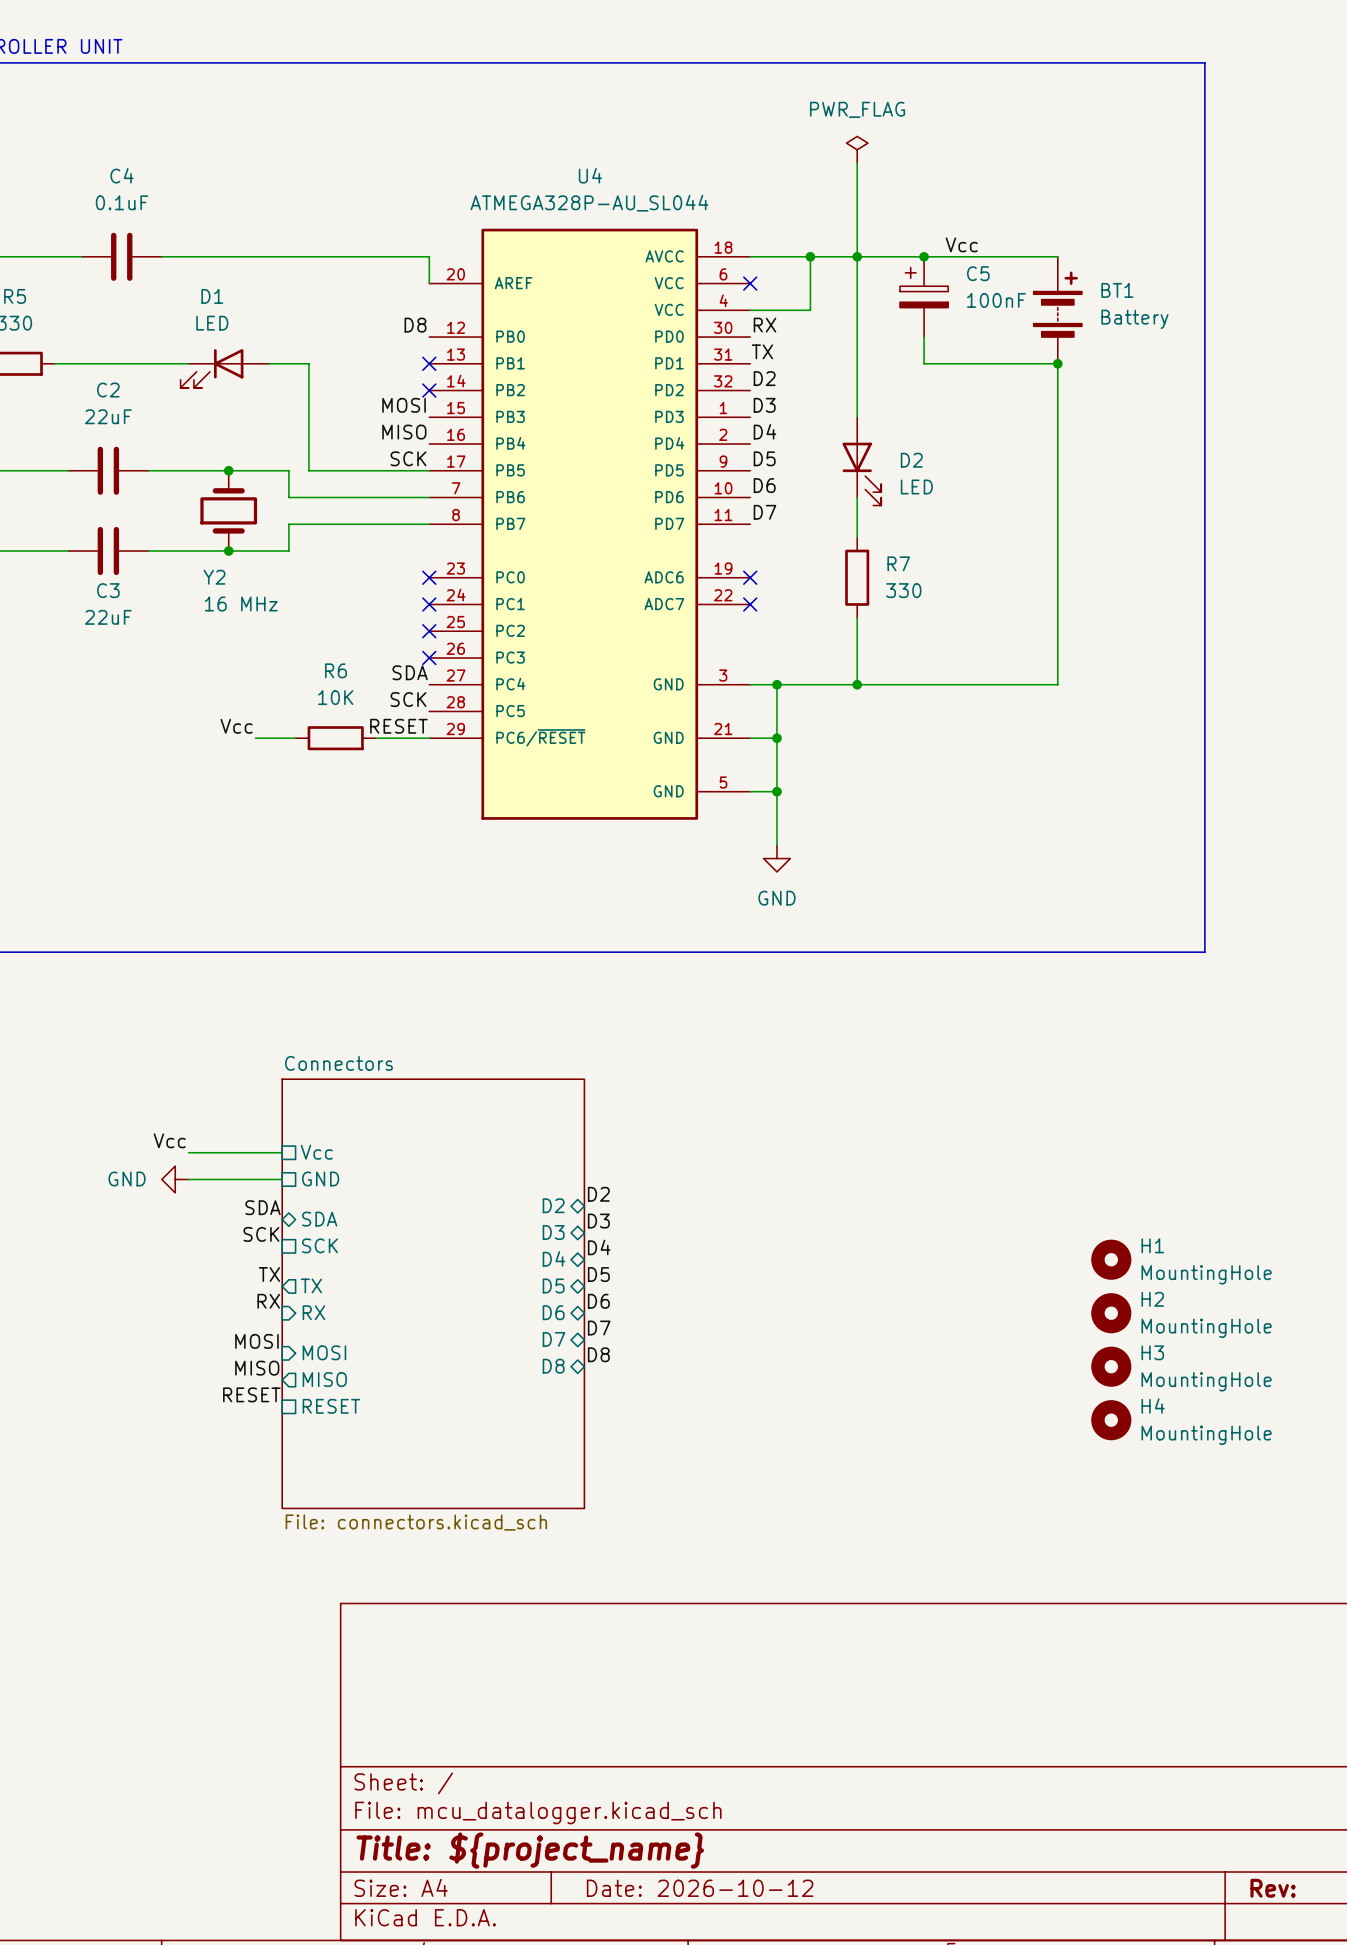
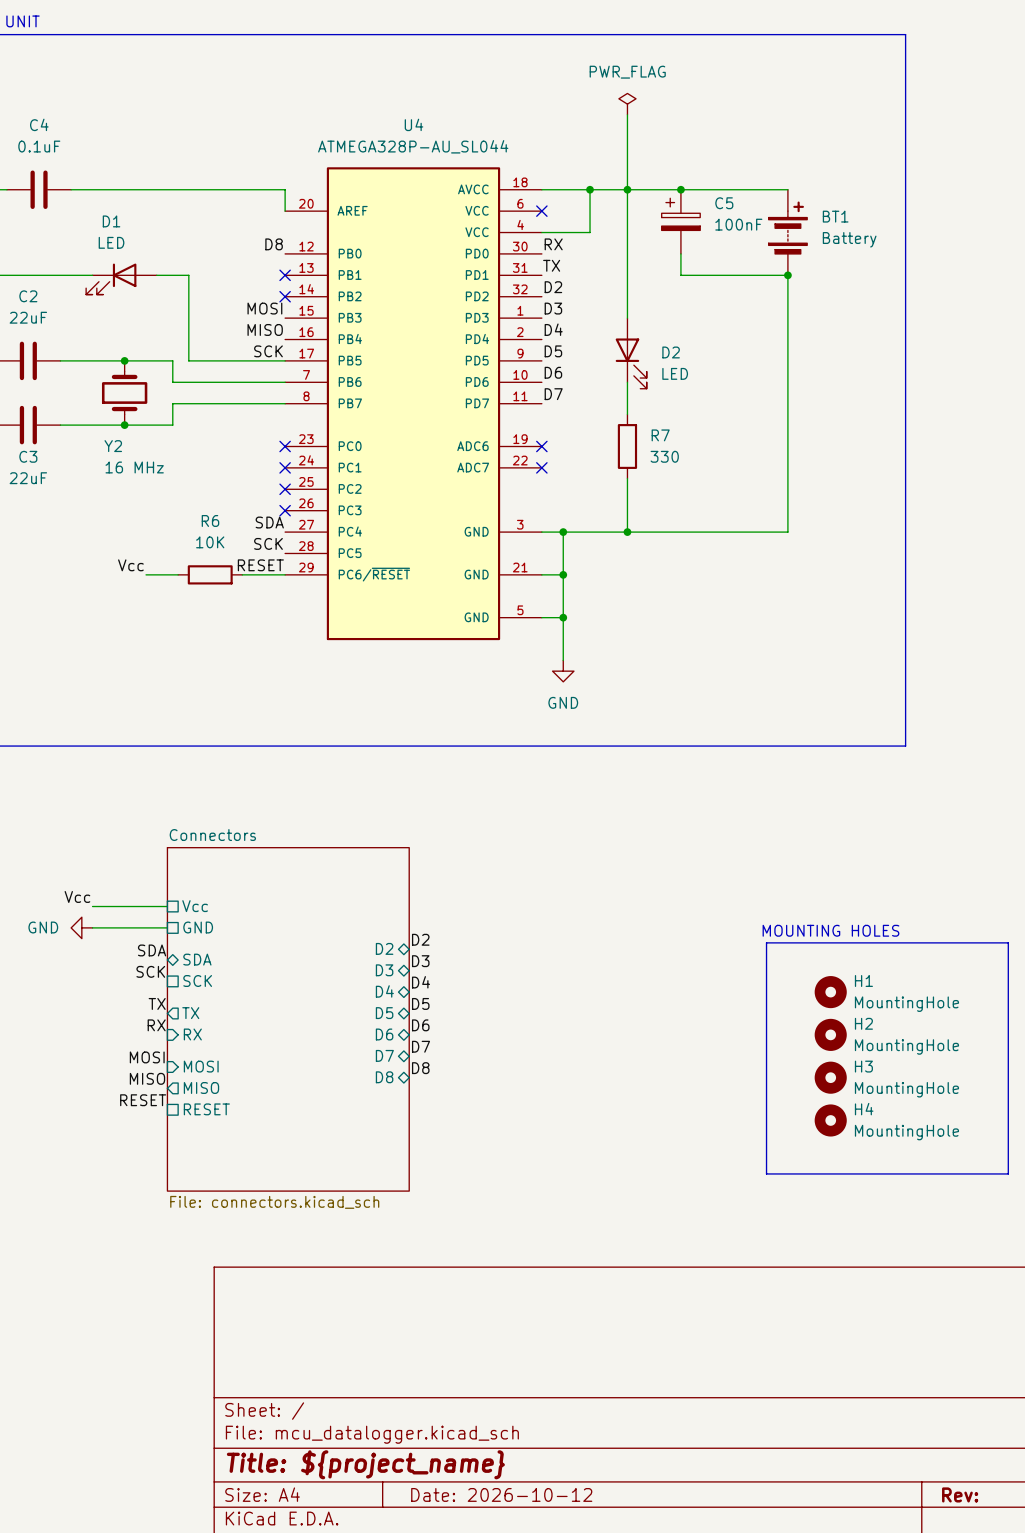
label: Vcc (961, 244) -> none
text: none -> MOUNTING HOLES (830, 930)
line: none -> (766, 942) (1008, 942) (1008, 1173) (766, 1173) (766, 942)

